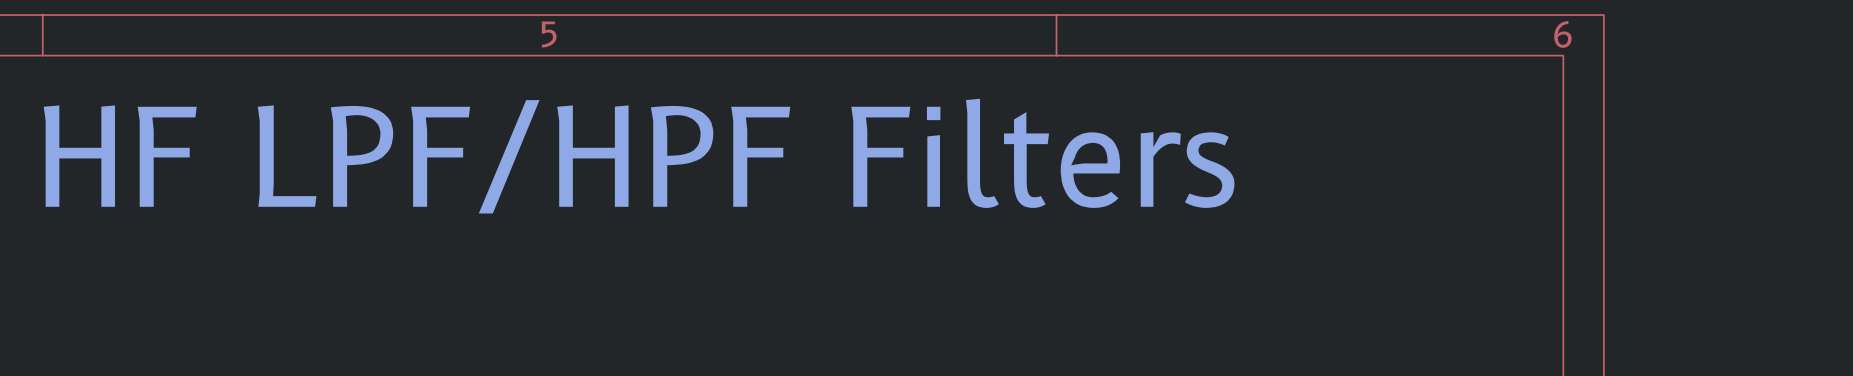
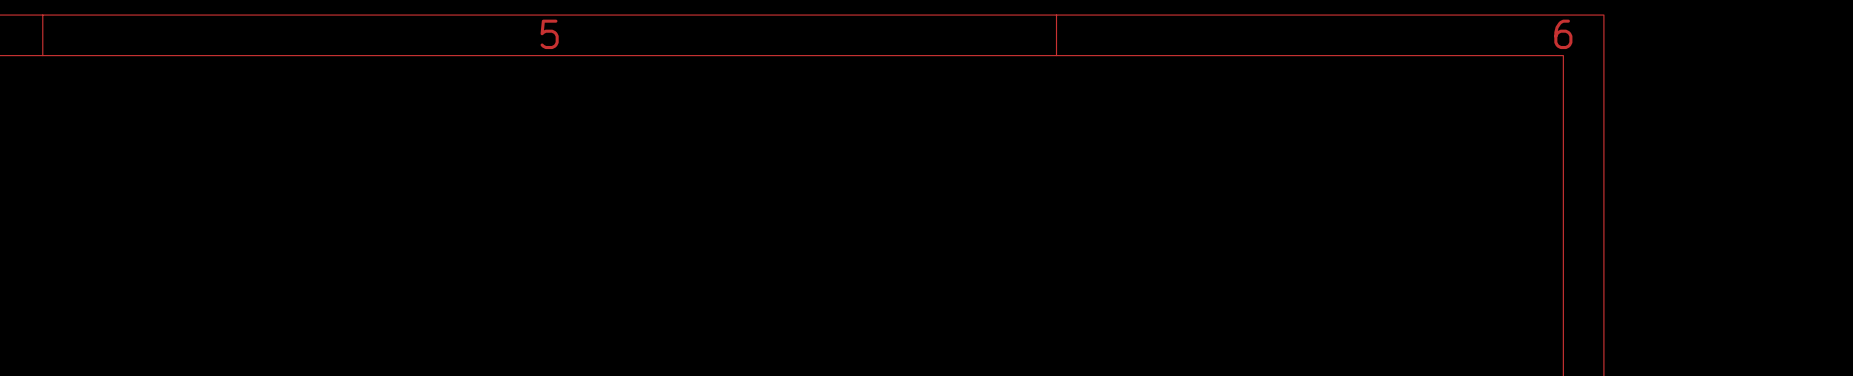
text: HF LPF/HPF Filters (639, 156) -> none

